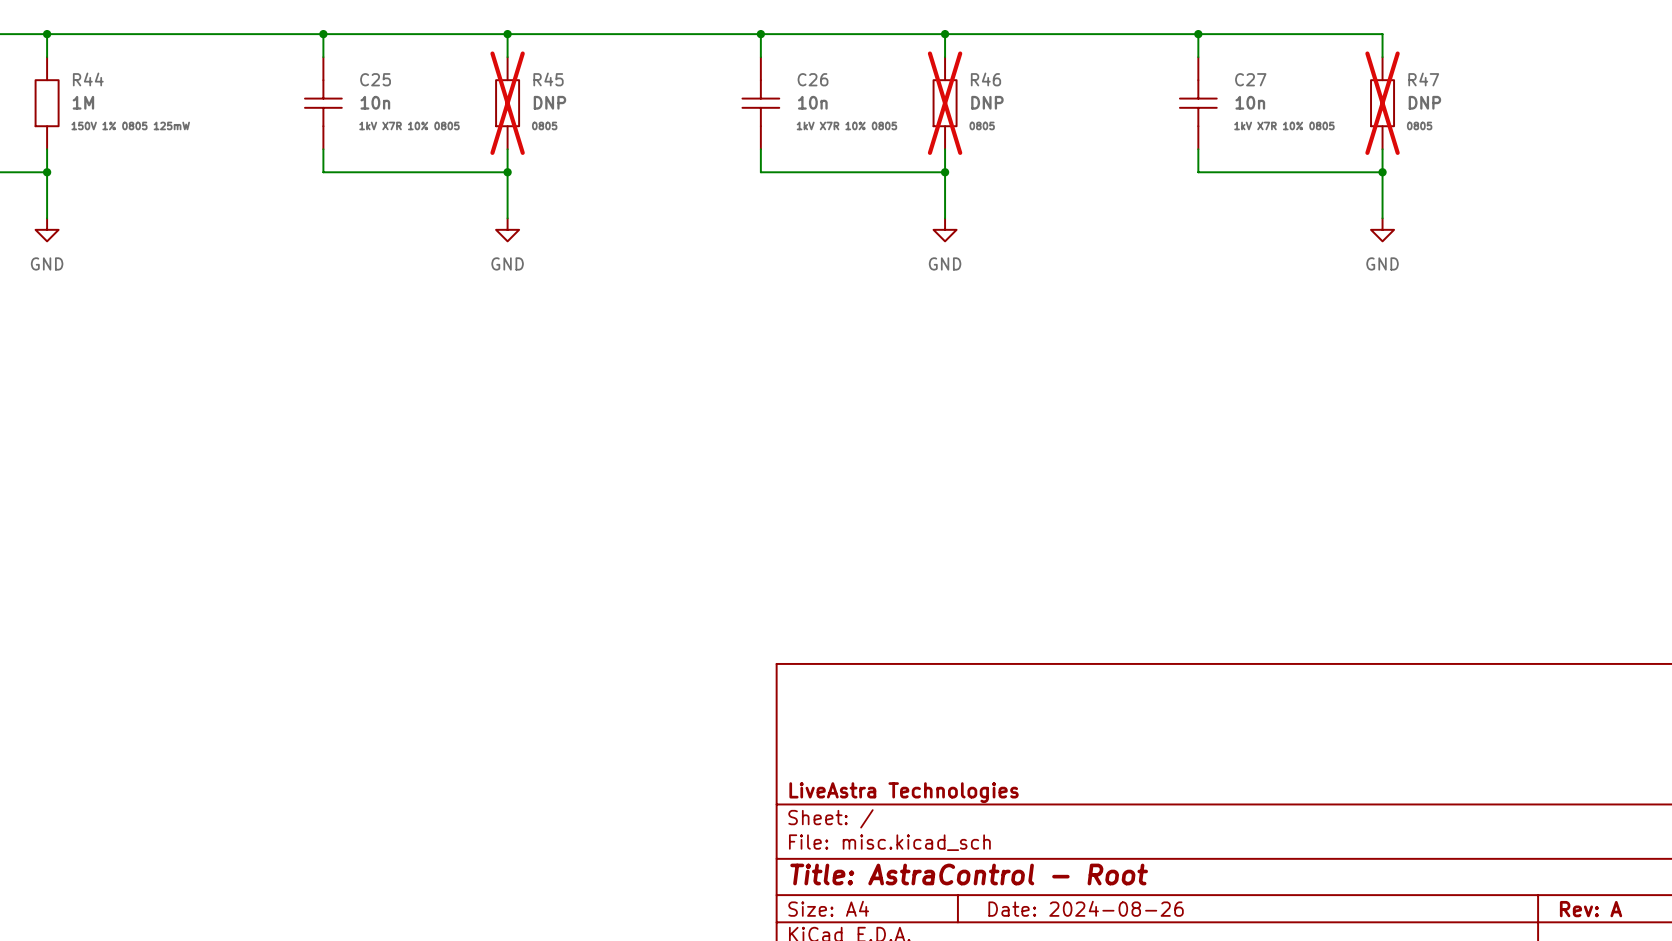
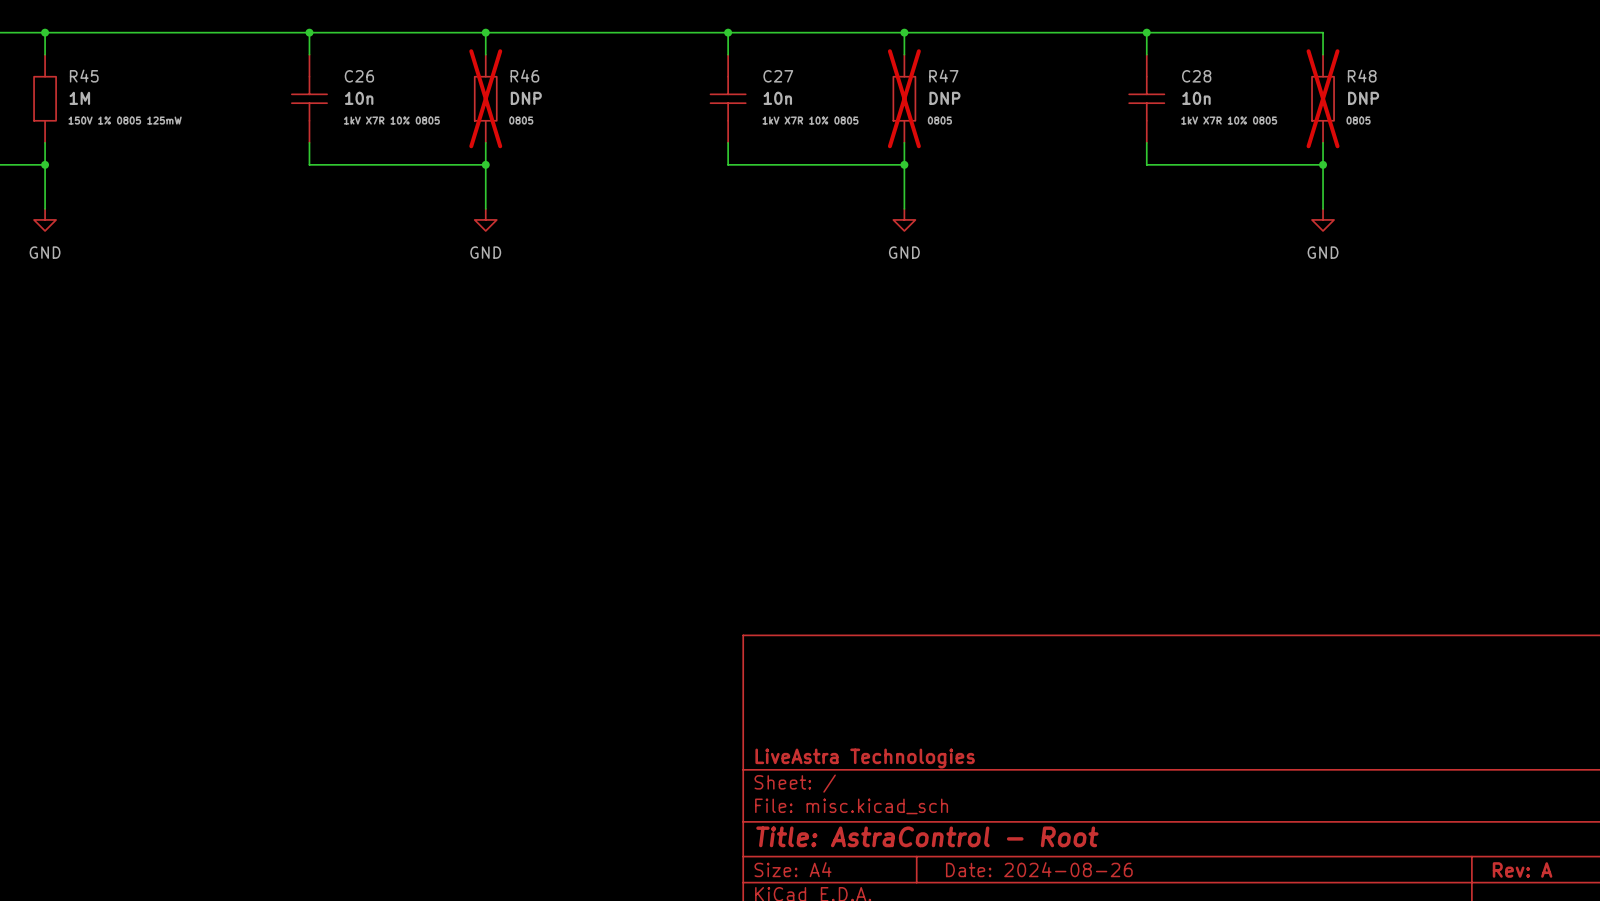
R44 name: R44 (88, 79) -> R45 (84, 76)
C25 name: C25 (375, 79) -> C26 (359, 76)
R45 name: R45 (548, 79) -> R46 (524, 76)
C26 name: C26 (813, 79) -> C27 (778, 76)
R46 name: R46 (985, 79) -> R47 (943, 76)
C27 name: C27 (1250, 79) -> C28 (1196, 76)
R47 name: R47 (1423, 79) -> R48 (1362, 76)

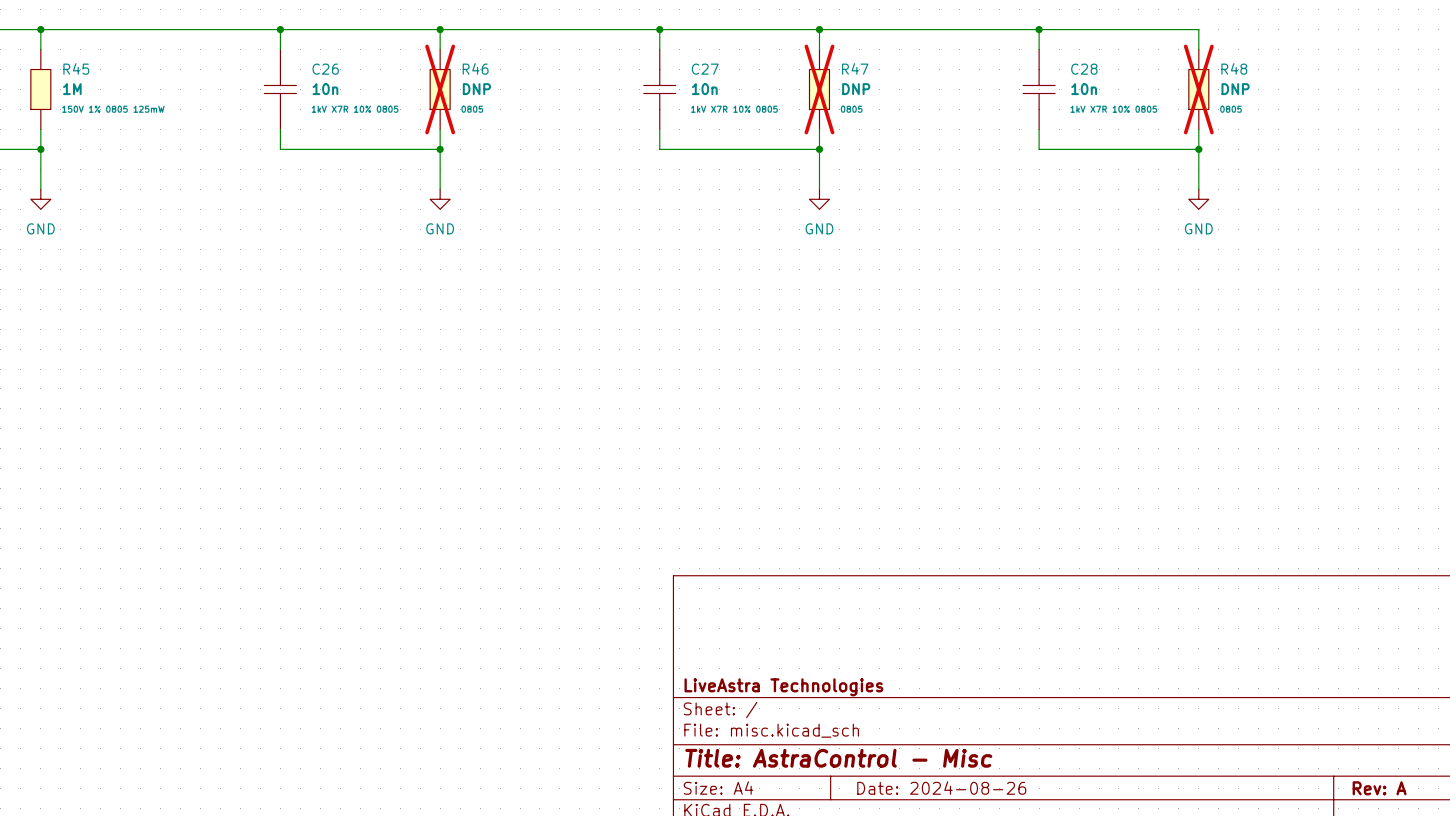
title block: Title: AstraControl - Root (927, 836) -> Title: AstraControl - Misc (838, 758)

